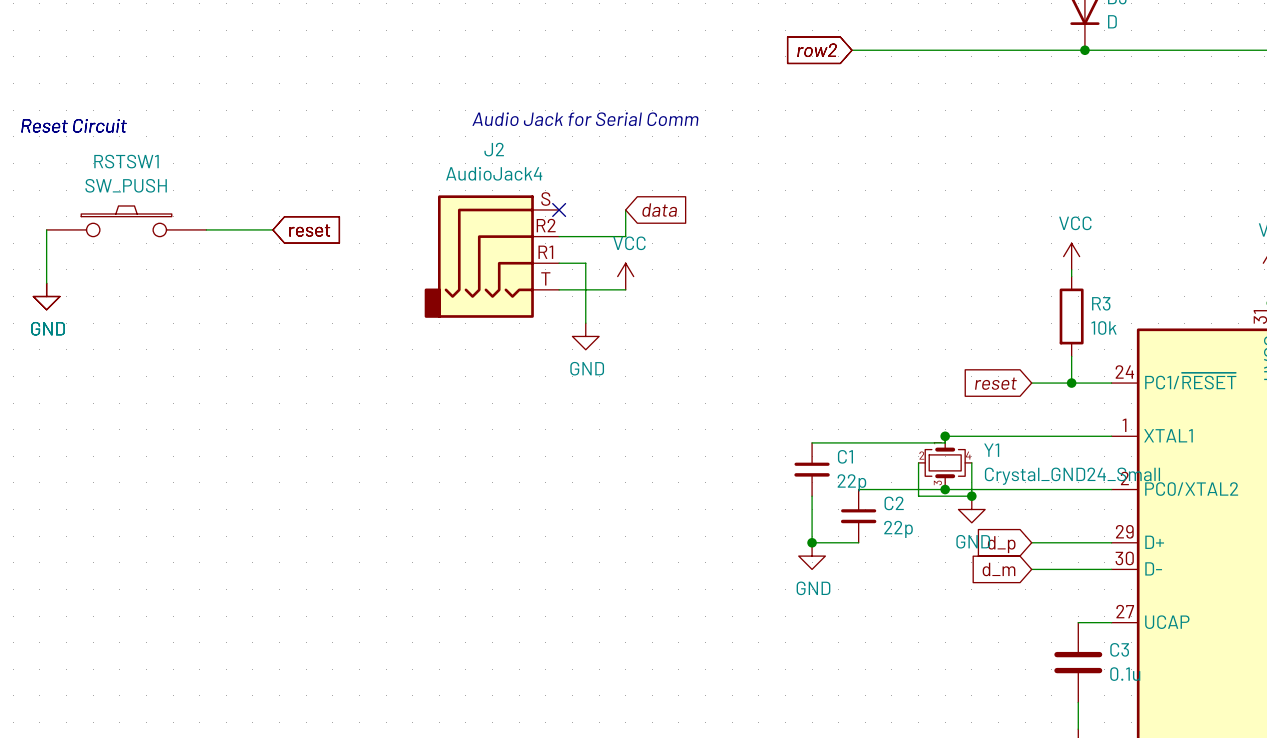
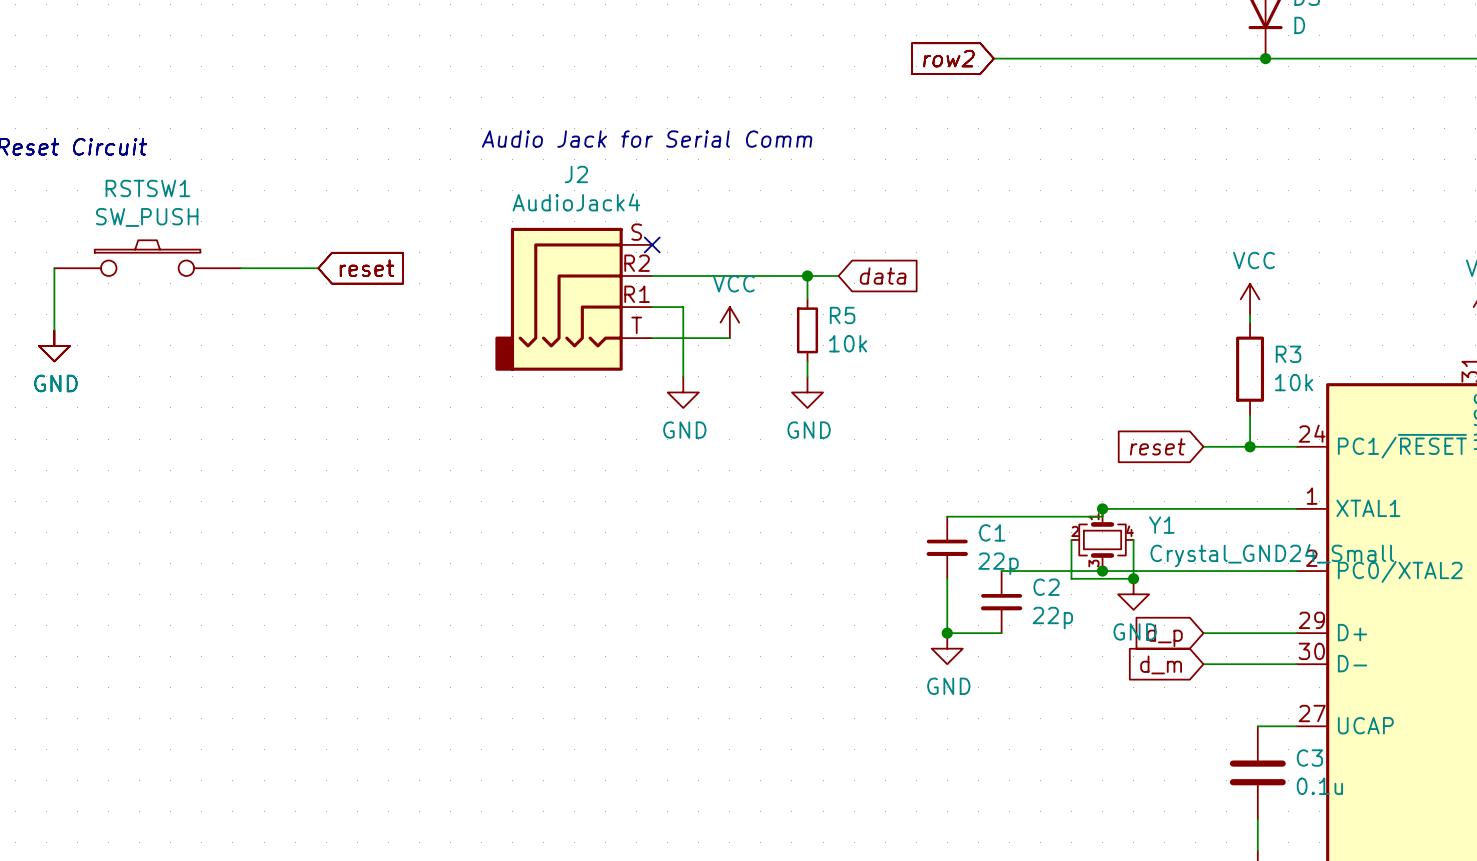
wire: (625, 209) (625, 236) -> (838, 276) (729, 276)
global label position: data (659, 210) -> data (883, 276)
wire: none -> (807, 276) (807, 299)
junction: none -> (807, 276)
R5: none -> 10k (807, 330)
wire: none -> (807, 361) (807, 376)
power symbol: none -> GND (807, 392)

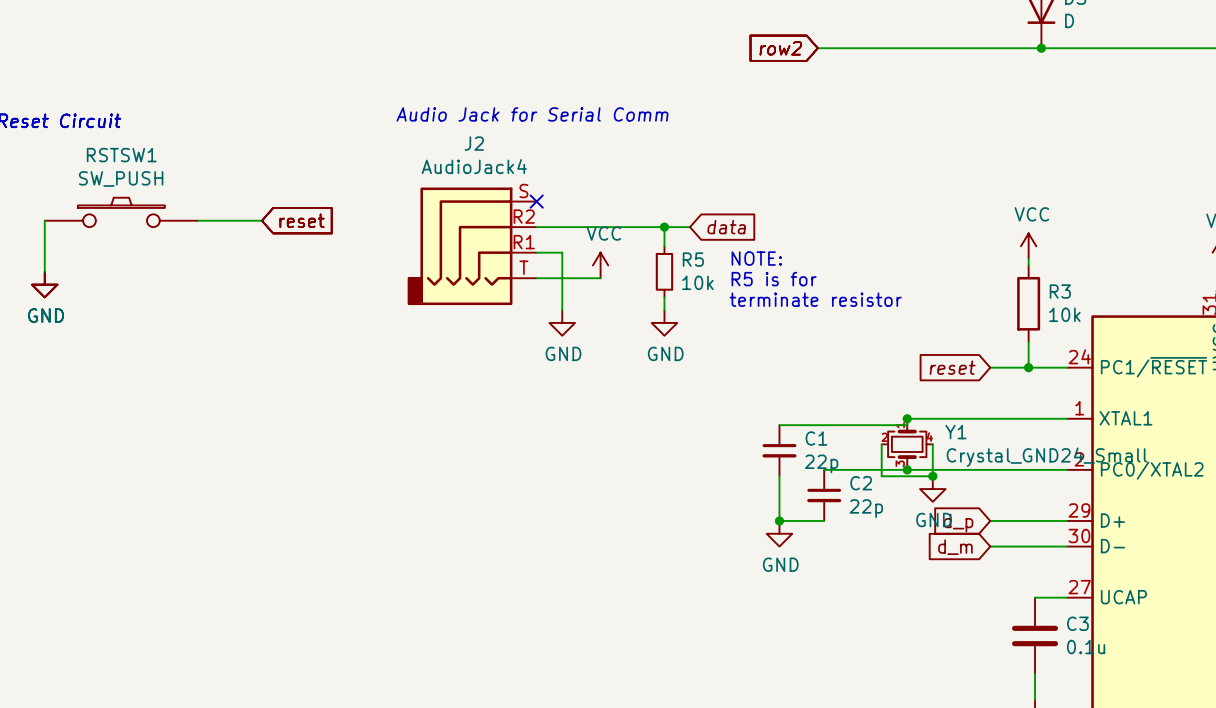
text: none -> NOTE: (756, 258)
text: none -> R5 is for (774, 279)
text: none -> terminate resistor (815, 299)

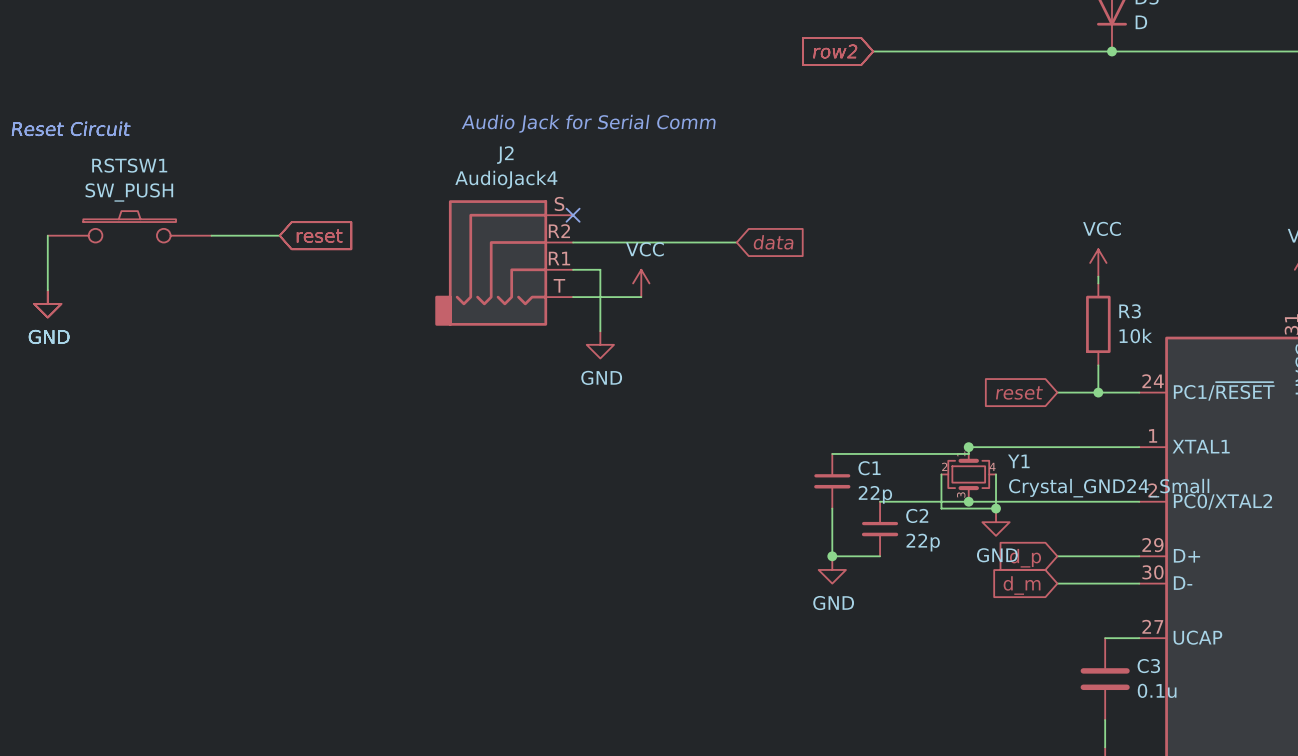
wire: (664, 227) (664, 246) -> none
junction: (664, 227) -> none
text: NOTE: (756, 258) -> none
R5: 10k (664, 271) -> none
text: R5 is for (774, 279) -> none
wire: (664, 297) (664, 310) -> none
text: terminate resistor (815, 299) -> none
power symbol: GND (664, 322) -> none

